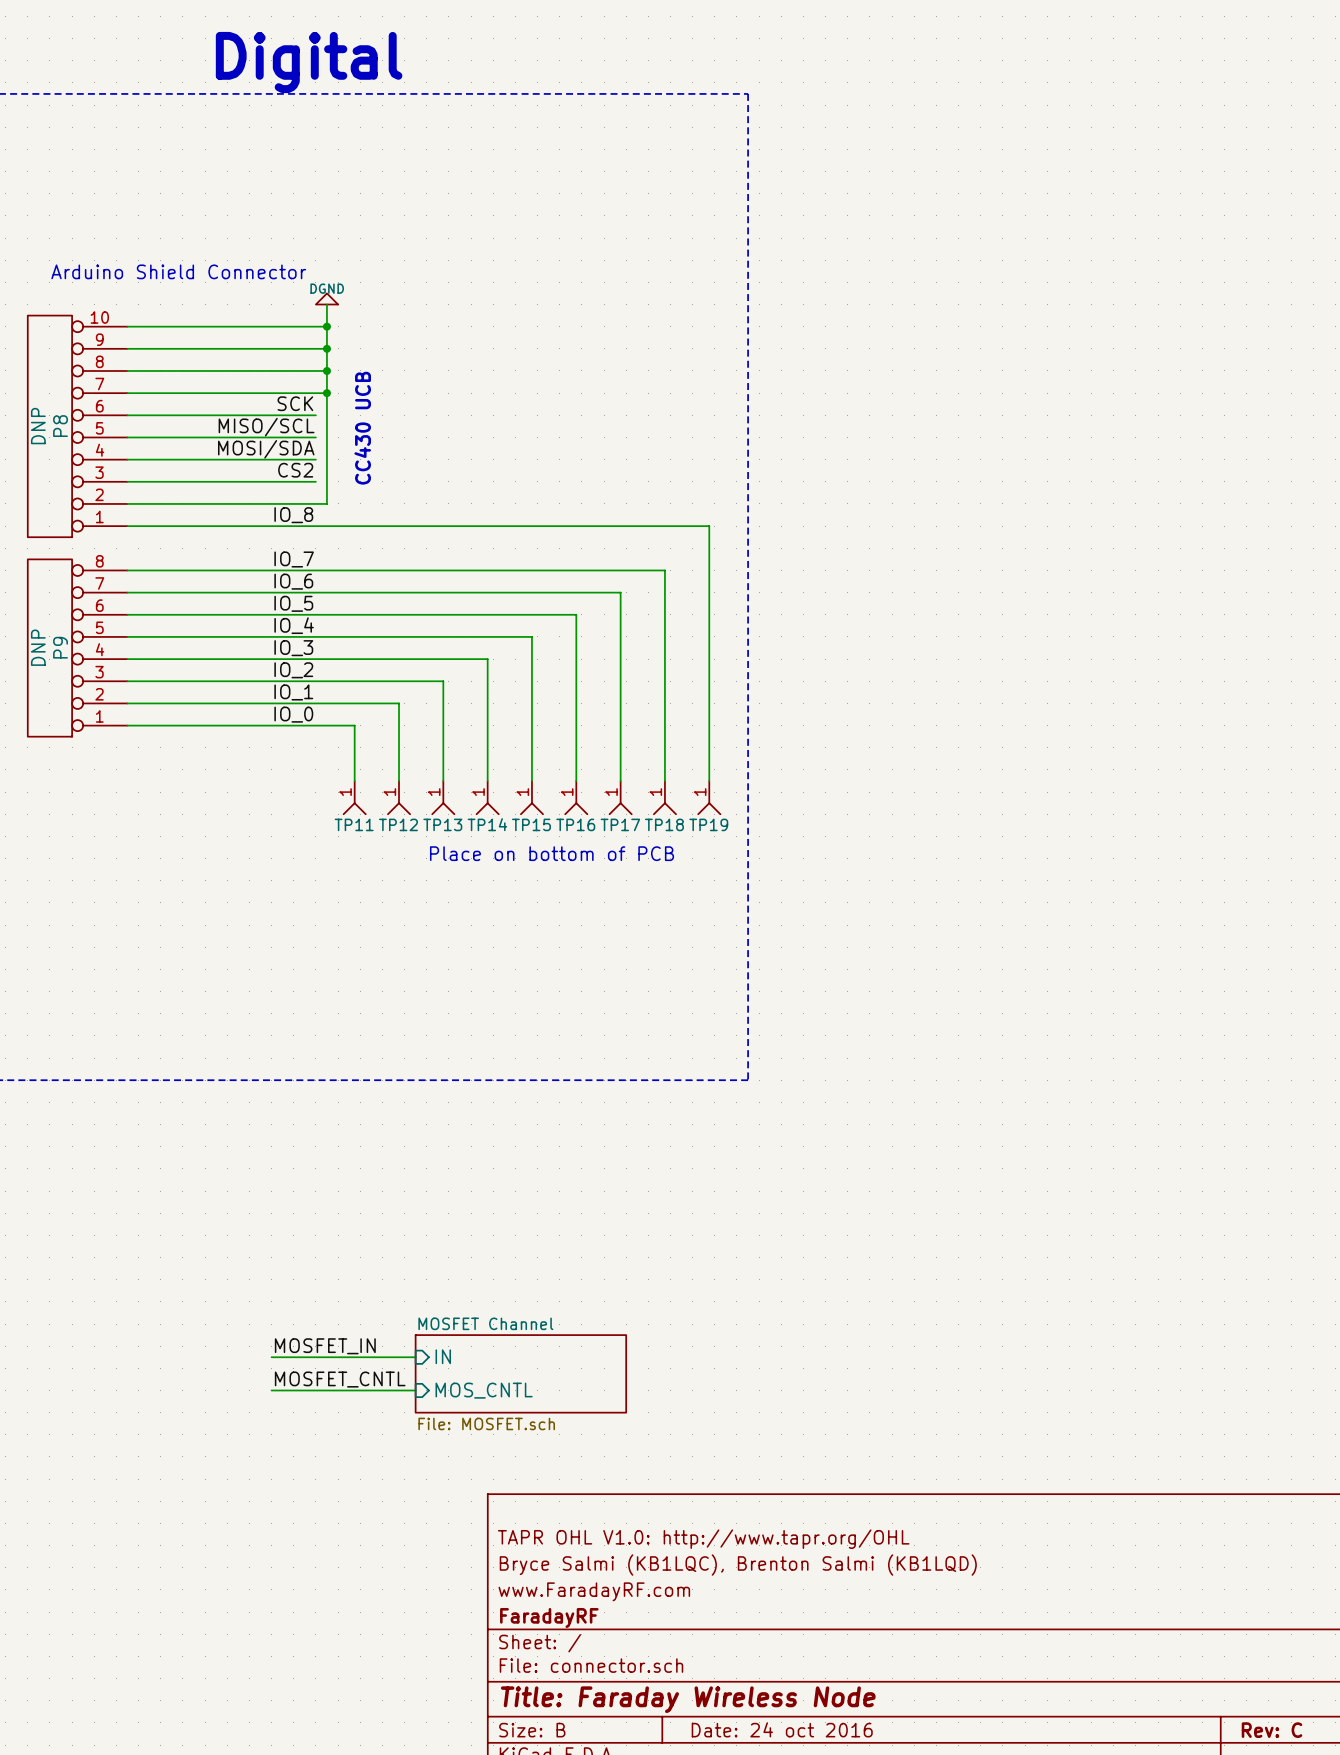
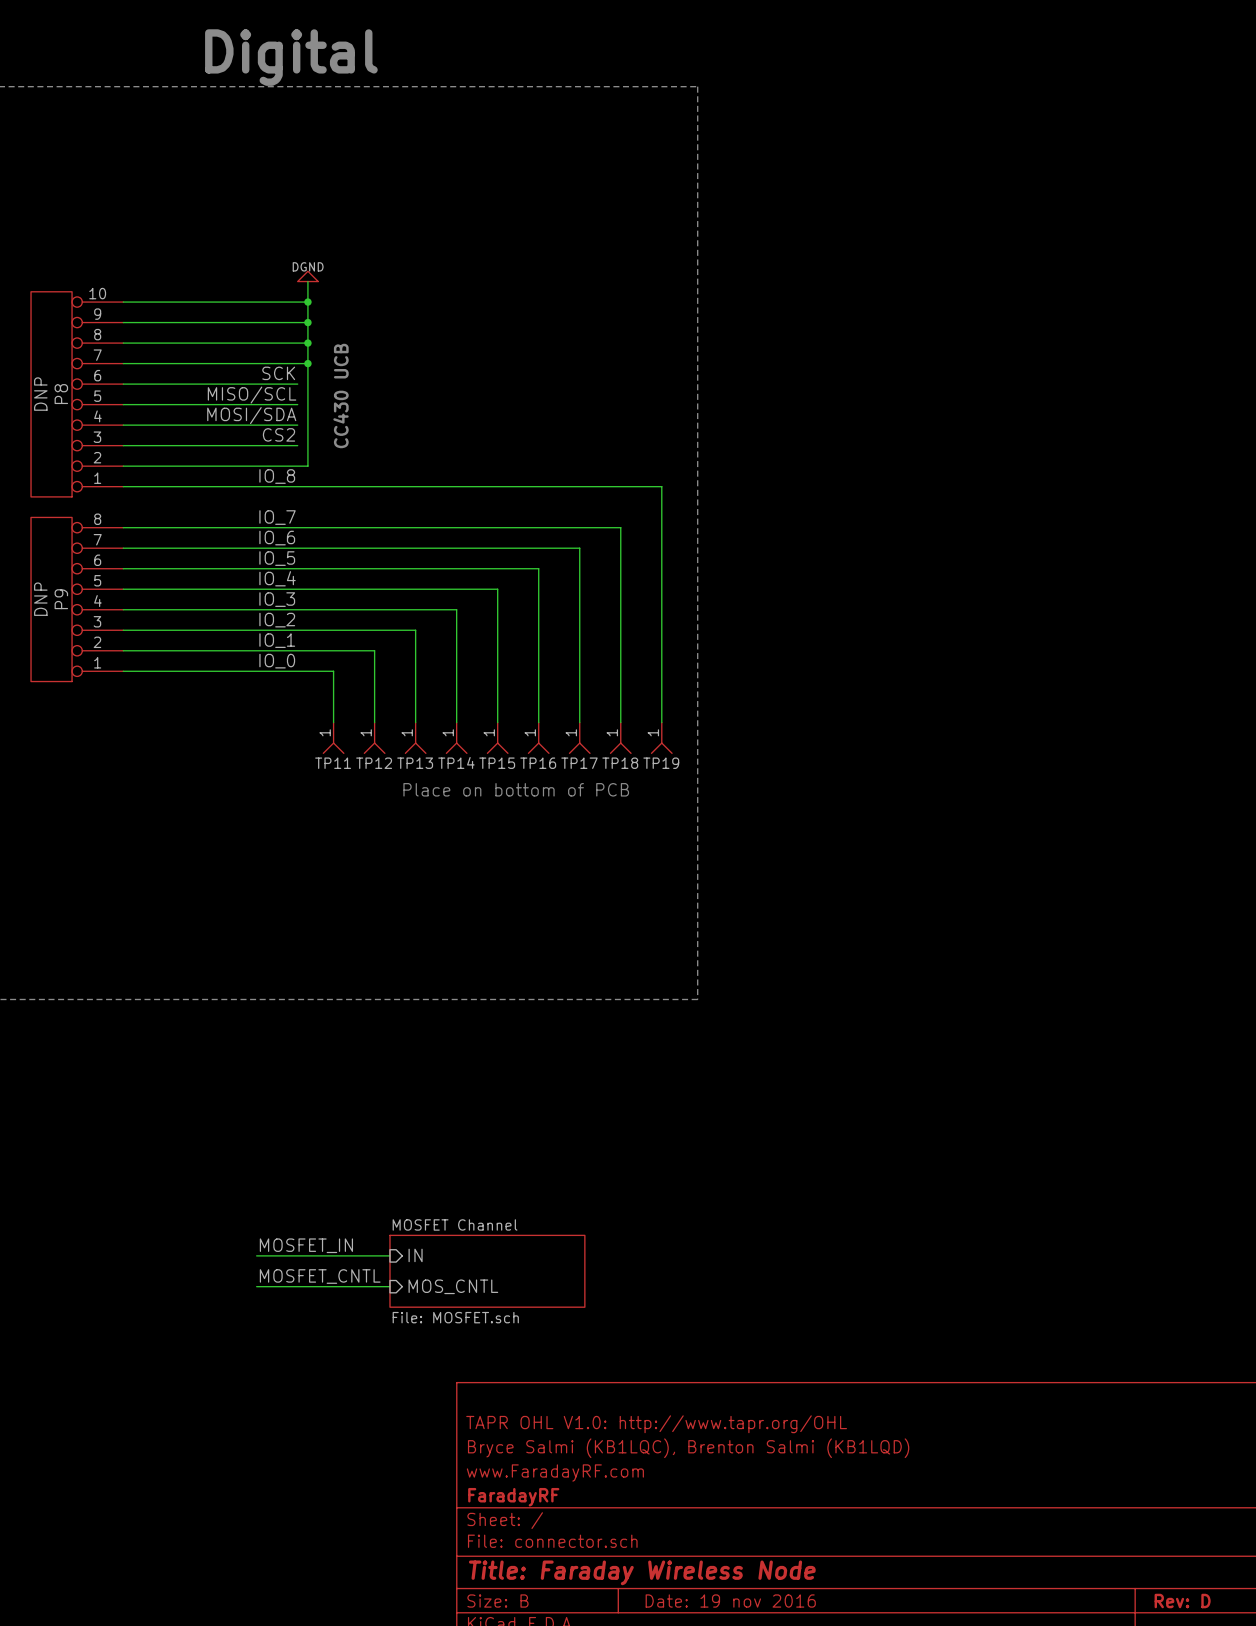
text: Arduino Shield Connector (178, 271) -> none
title block: Date: 24 oct 2016 (782, 1729) -> Date: 19 nov 2016 (730, 1601)
title block: Rev: C (1272, 1730) -> Rev: D (1182, 1601)

